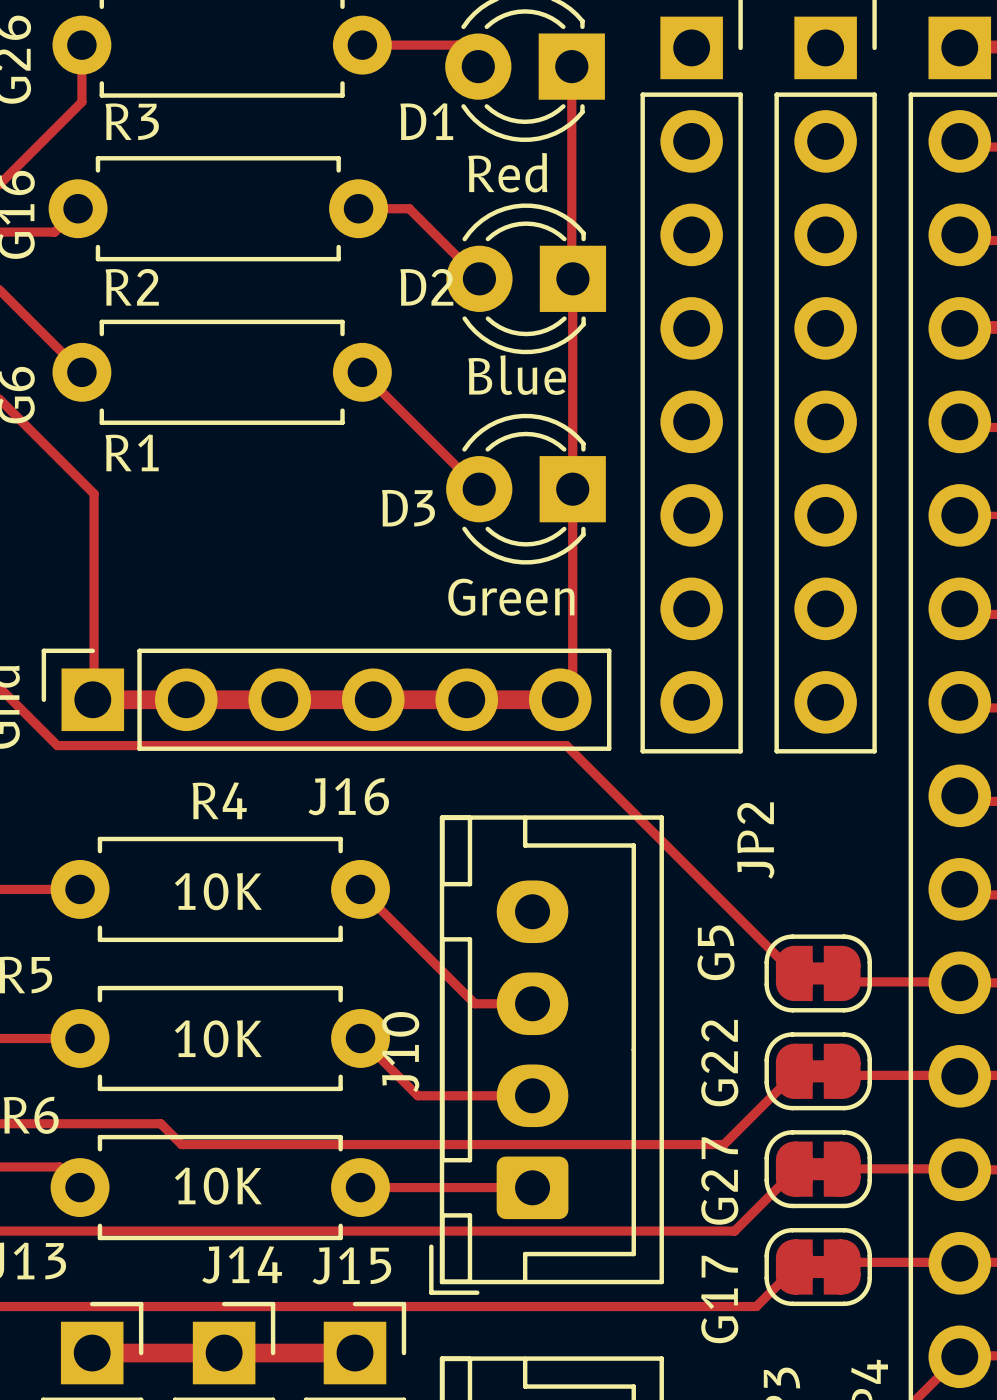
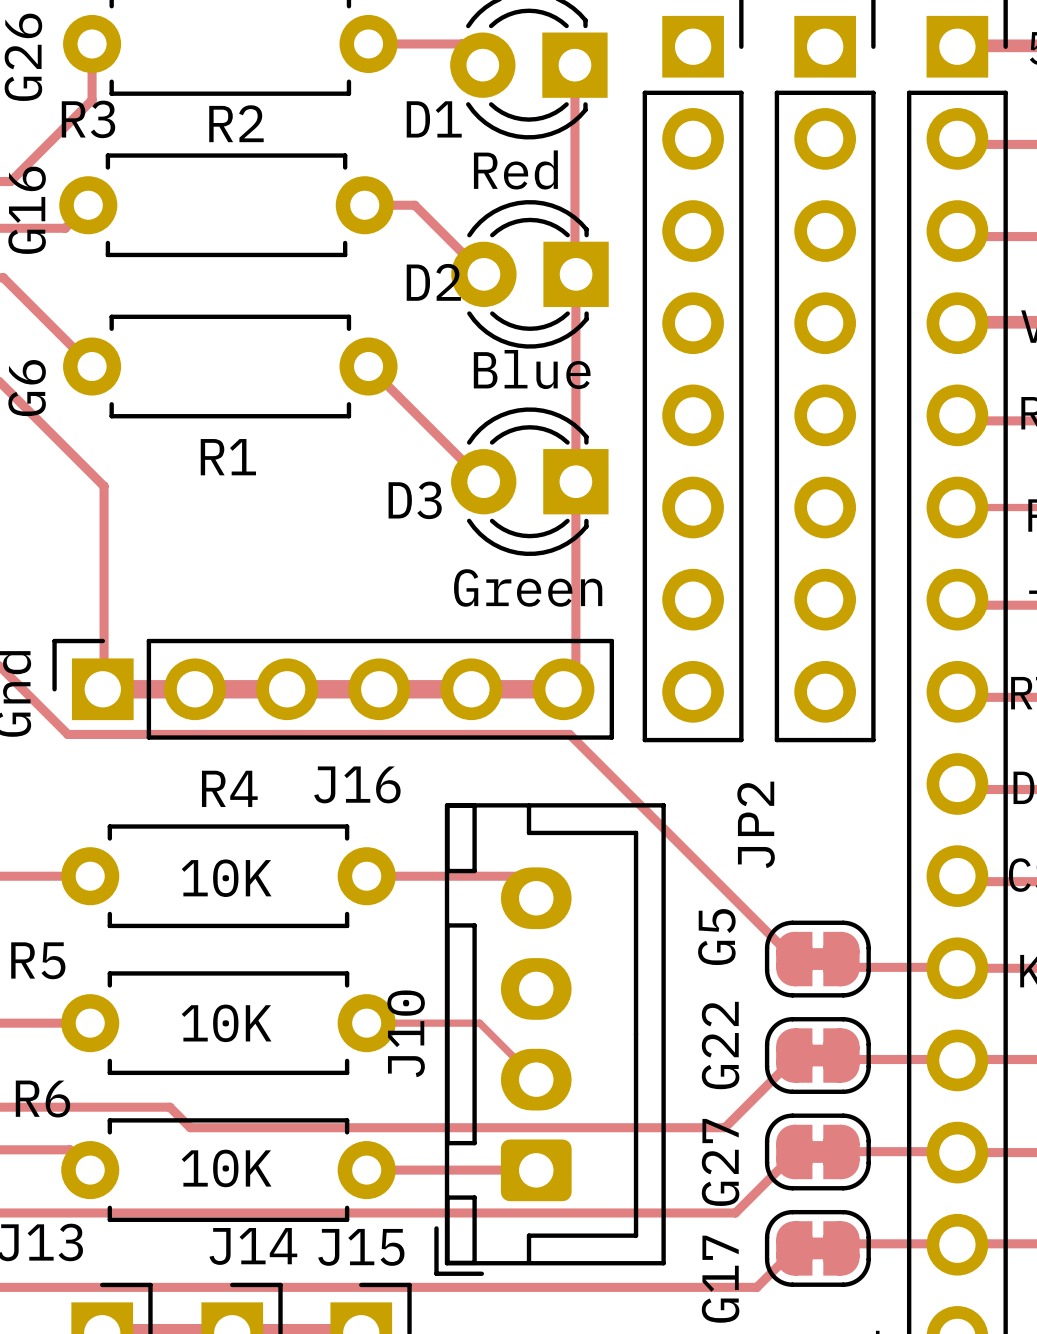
R3 name position: R3 (132, 121) -> R3 (88, 119)
R2 name position: R2 (132, 287) -> R2 (236, 123)
R1 name position: R1 (132, 452) -> R1 (228, 457)
track: (360, 889) (474, 1003) (532, 1003) -> (366, 876) (555, 876)
track: (360, 1038) (417, 1095) (532, 1095) -> (366, 1023) (479, 1023) (536, 1079)

